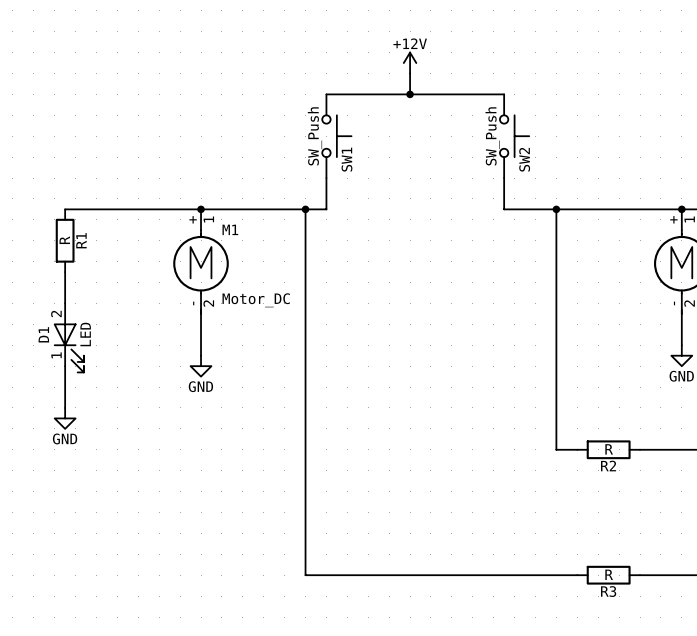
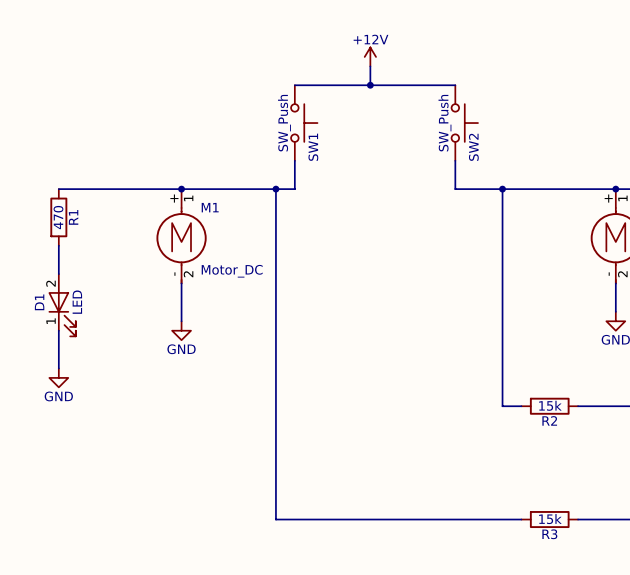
R1 value: R (64, 240) -> 470 (58, 217)
R2 value: R (609, 449) -> 15k (550, 405)
R3 value: R (609, 574) -> 15k (550, 519)

